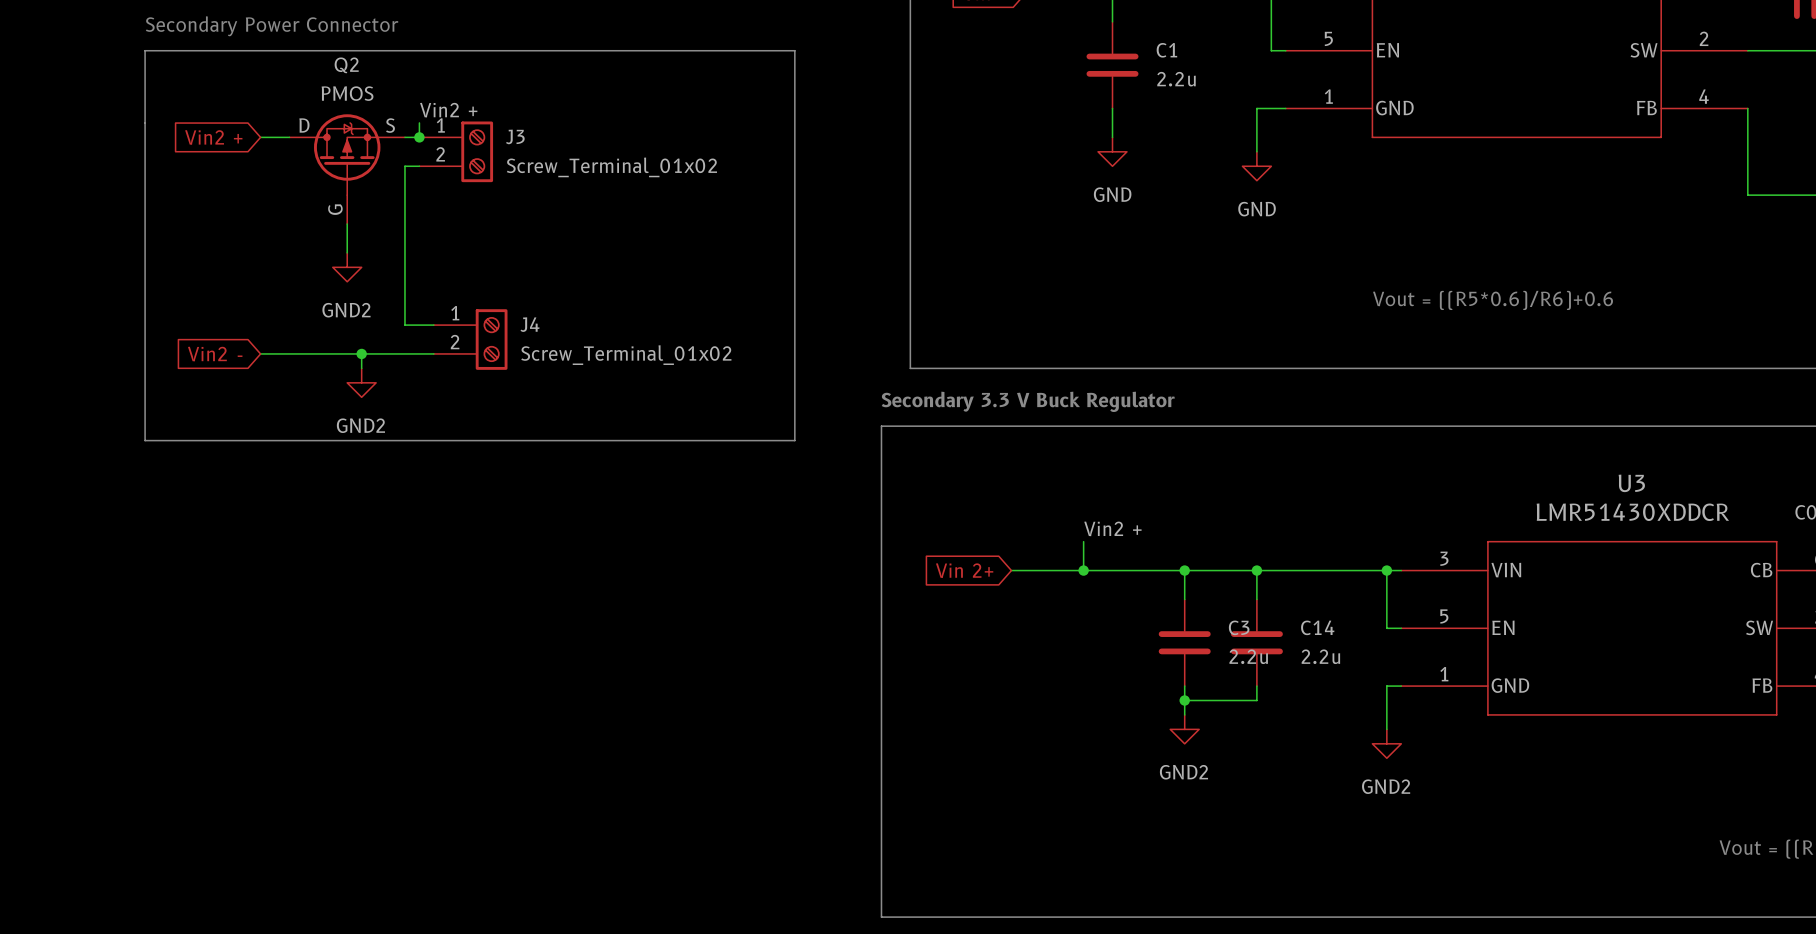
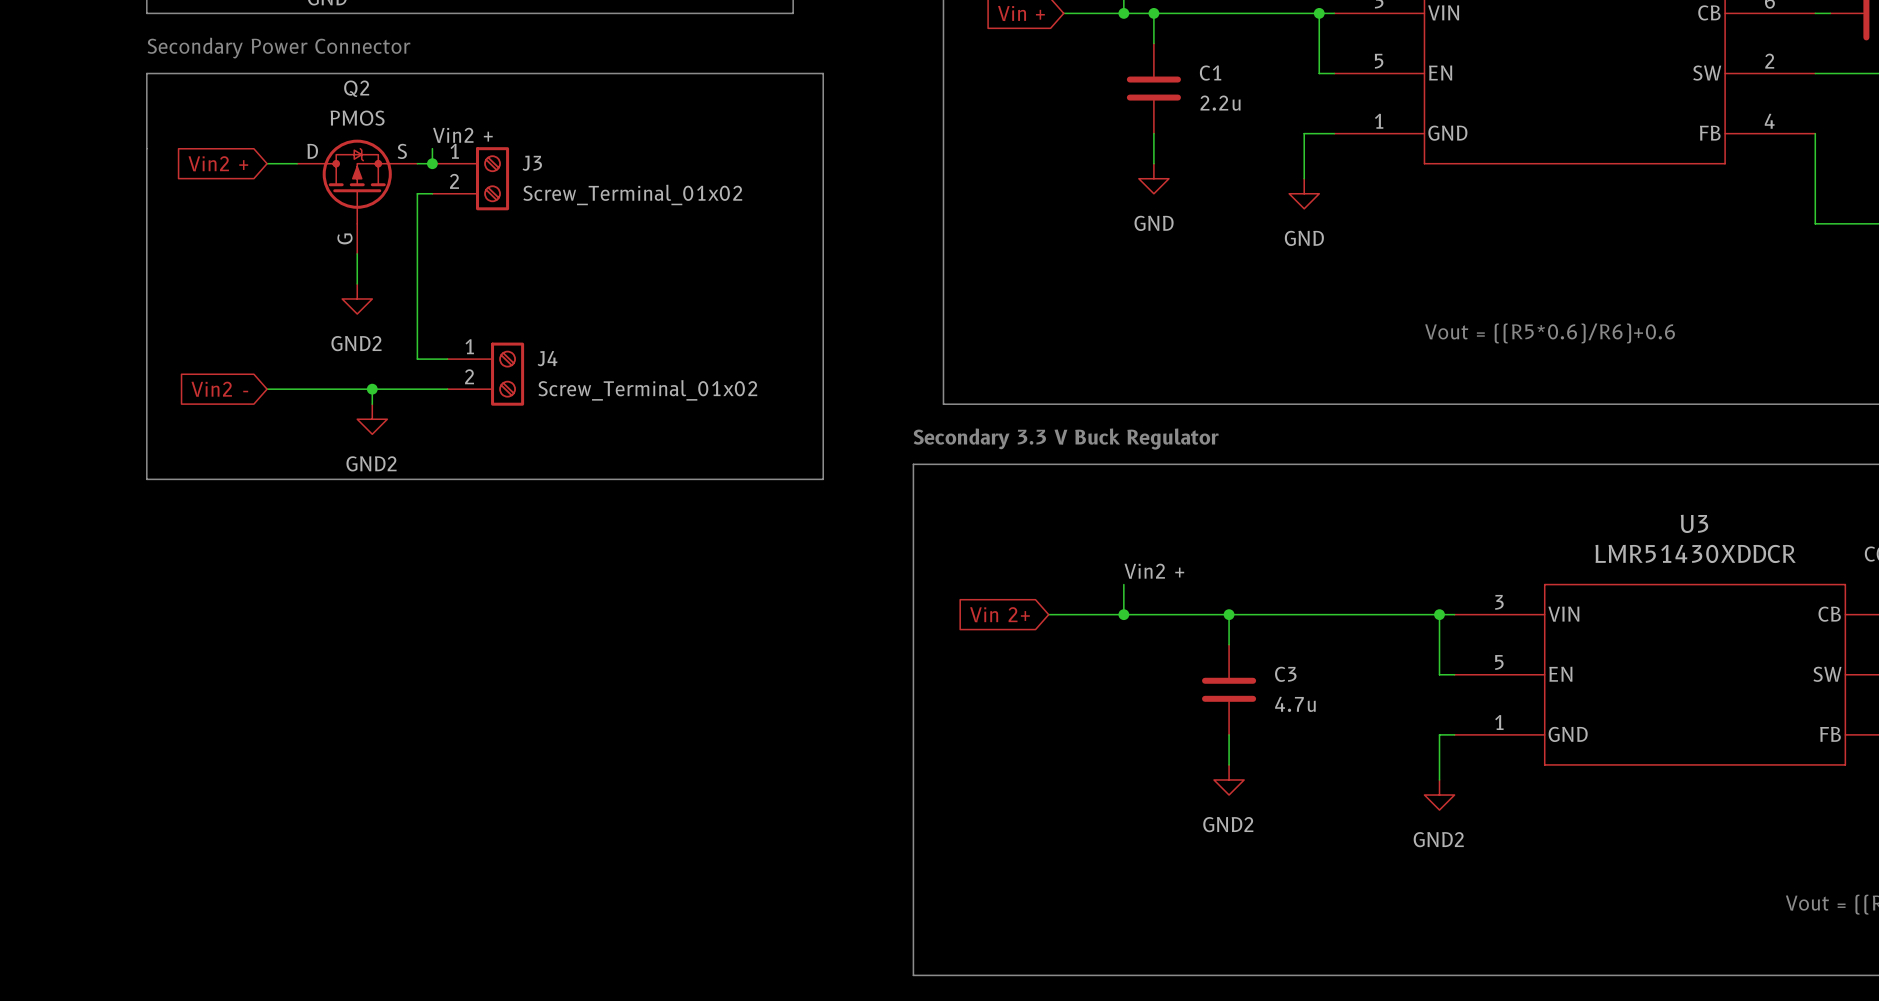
wire: (1256, 570) (1256, 599) -> none
junction: (1256, 570) -> none
C14: 2.2u (1256, 642) -> none
C3 value: 2.2u (1248, 656) -> 4.7u (1295, 704)
wire: (1256, 686) (1256, 700) (1184, 700) -> none
junction: (1184, 700) -> none

